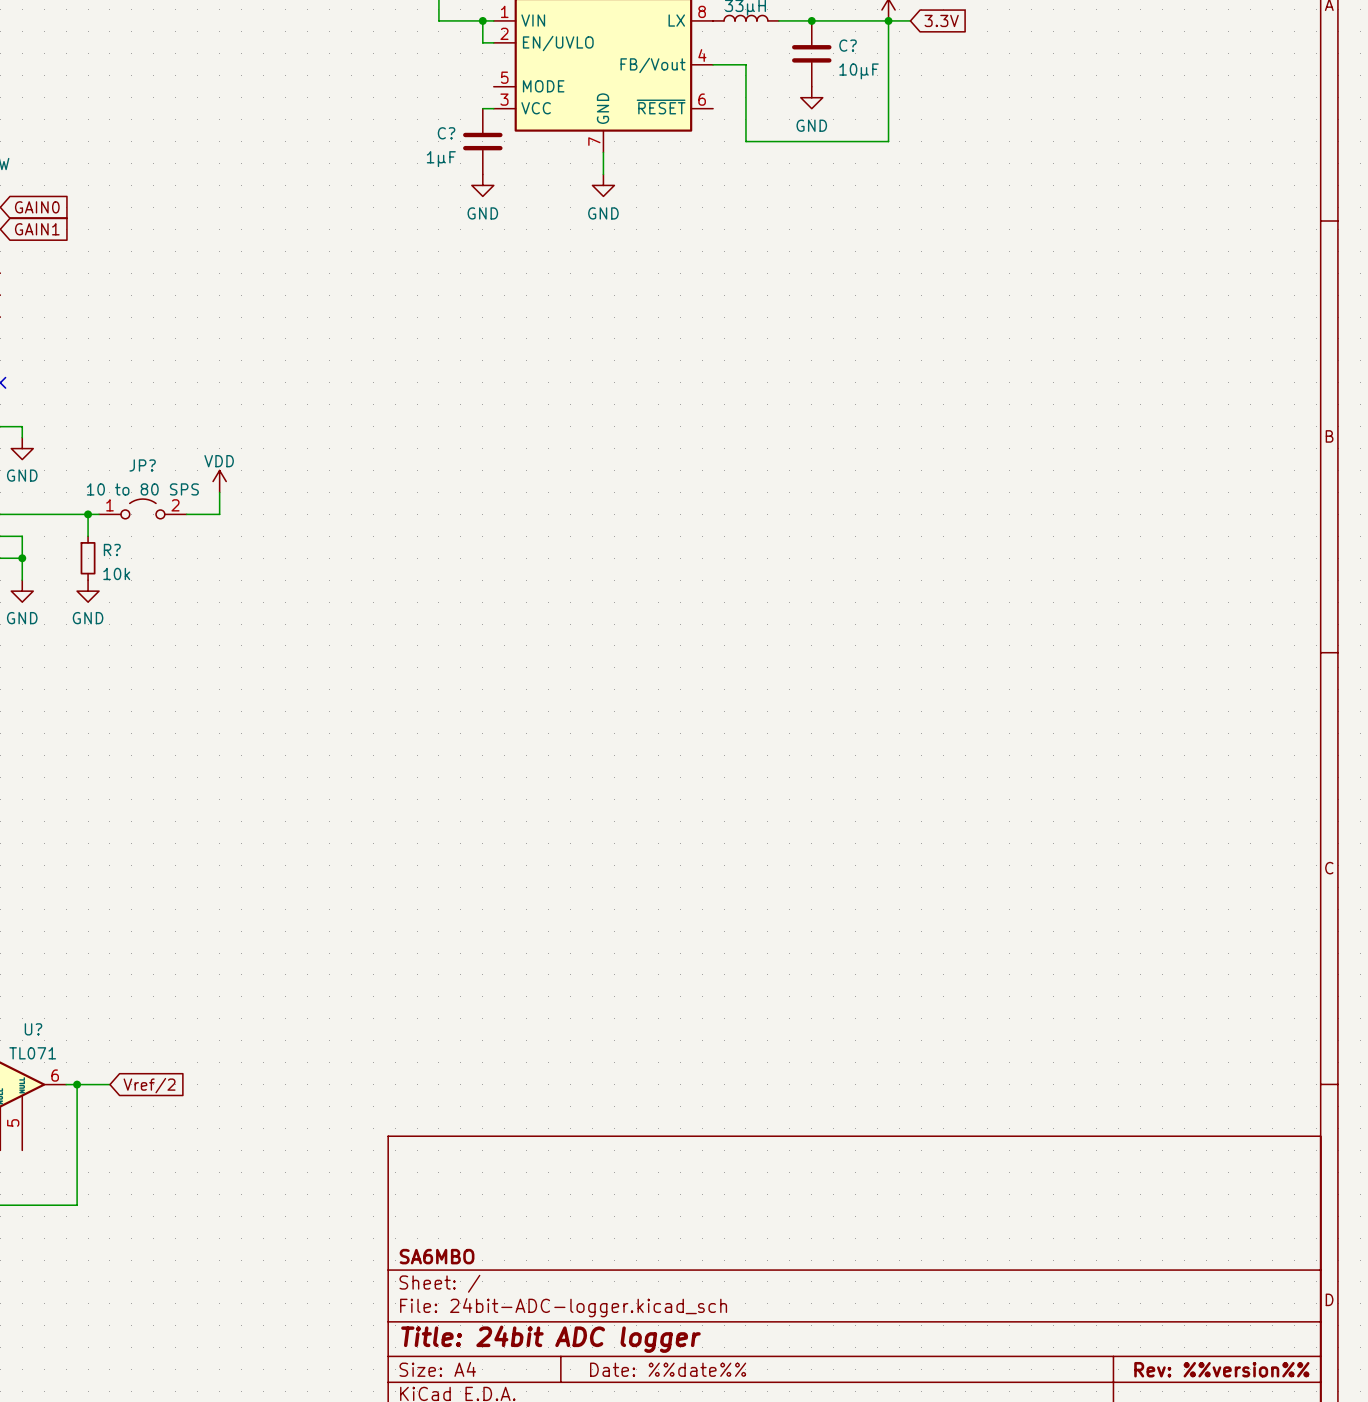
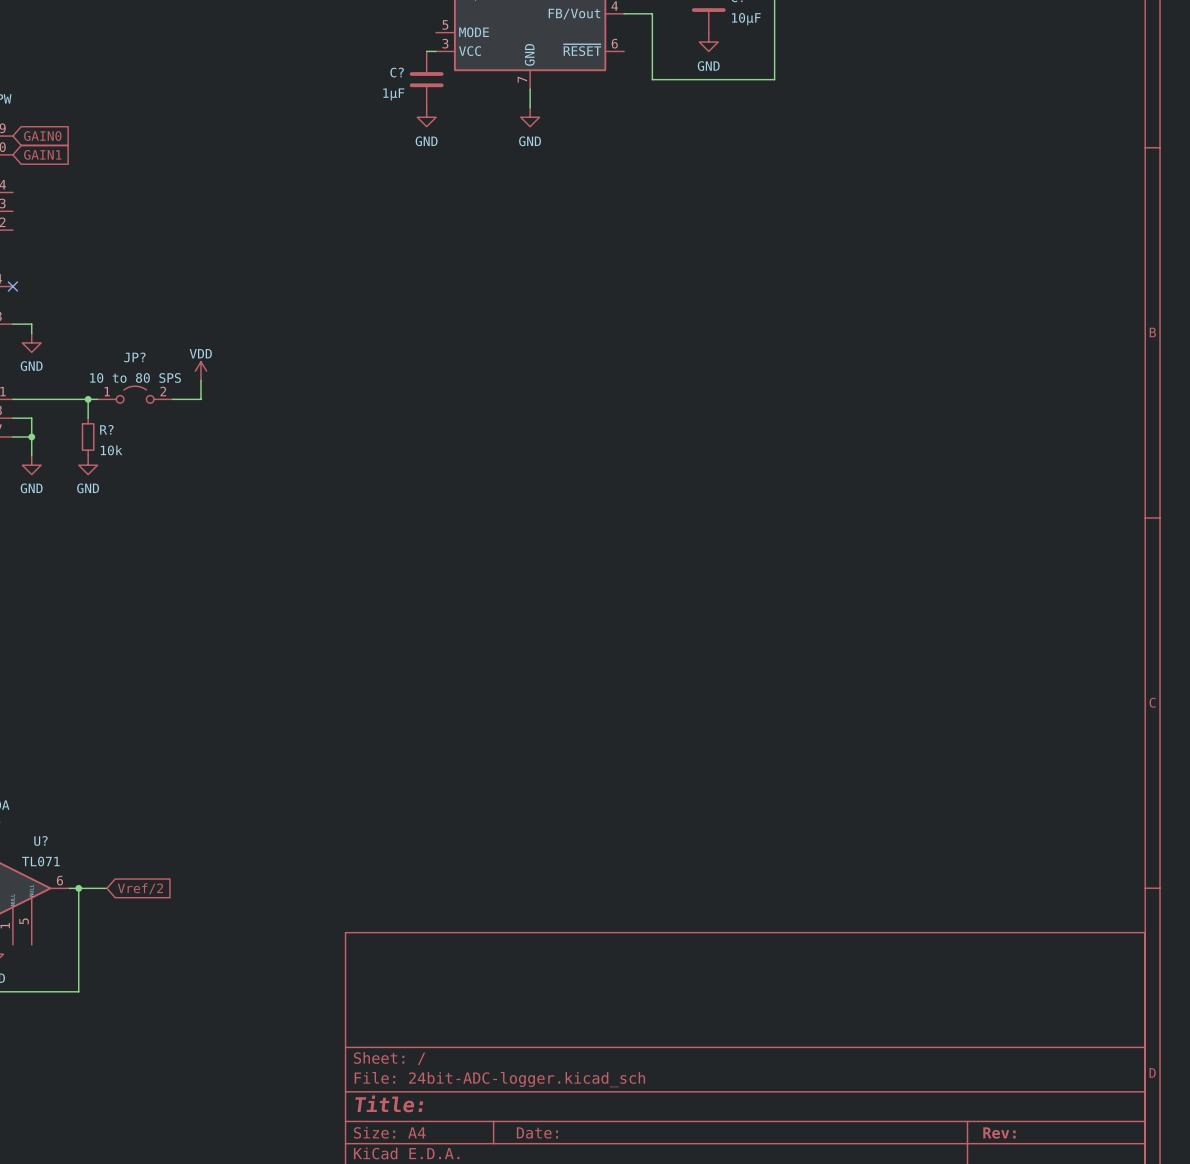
title block: SA6MBO (437, 1256) -> none
title block: Title: 24bit ADC logger (550, 1339) -> Title: (389, 1103)
title block: Date: %%date%% (668, 1369) -> Date: (537, 1132)
title block: Rev: %%version%% (1221, 1369) -> Rev: (999, 1132)

